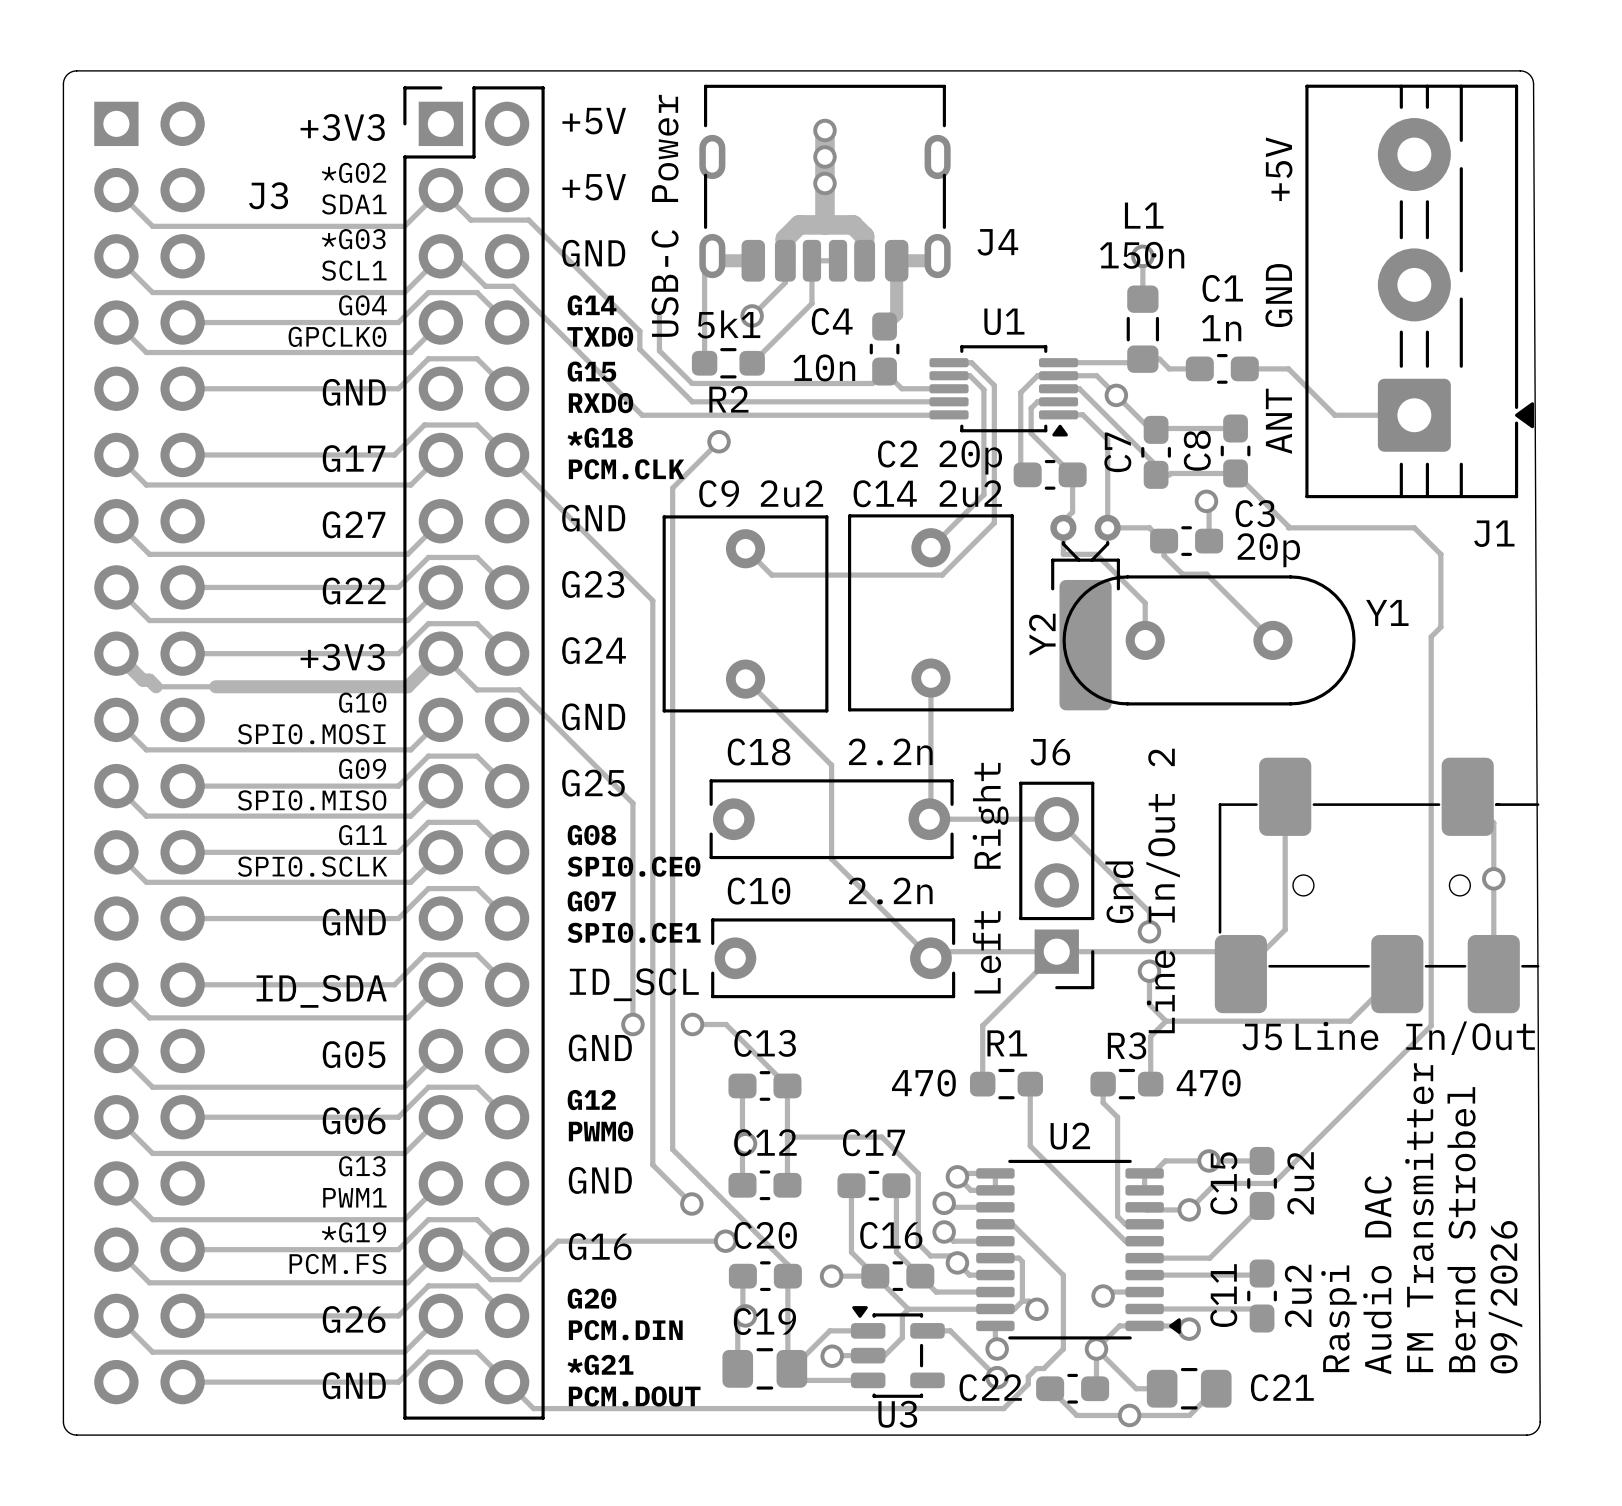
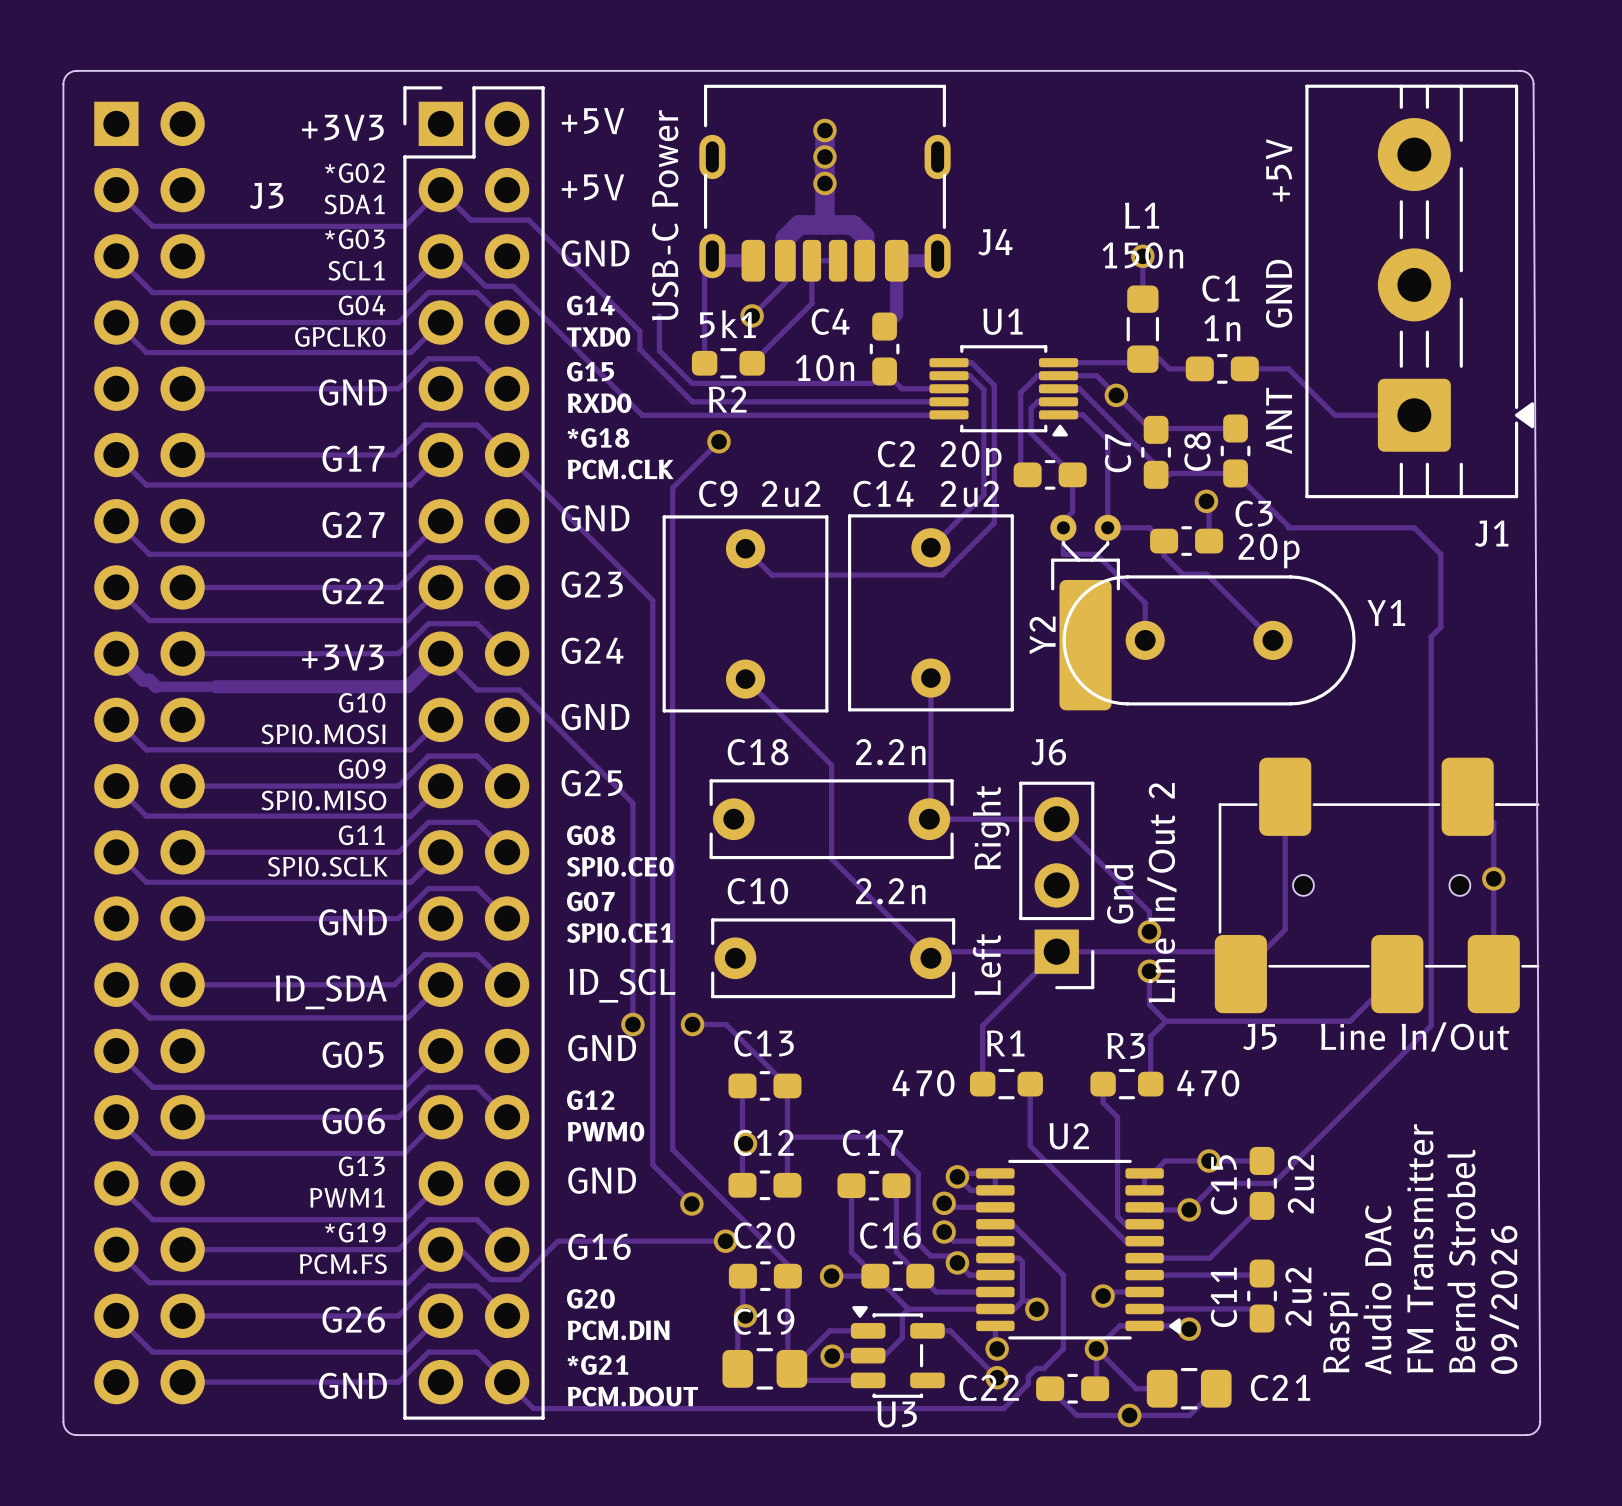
track width: thin (156, 686) (215, 686) -> thick (156, 686) (215, 686)

